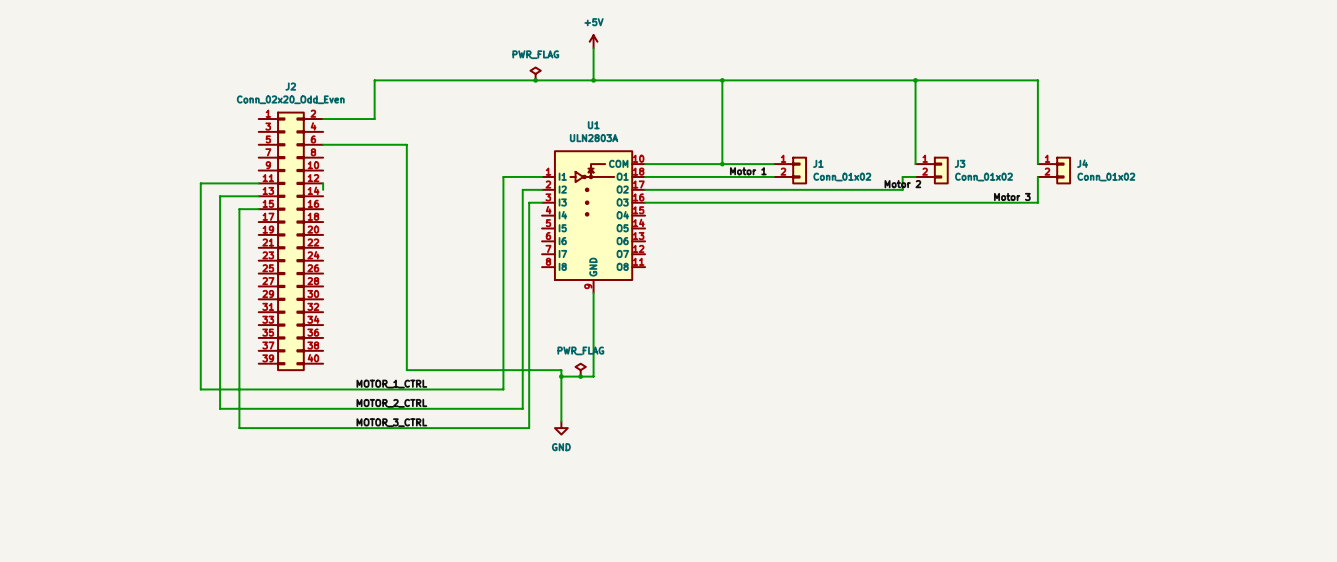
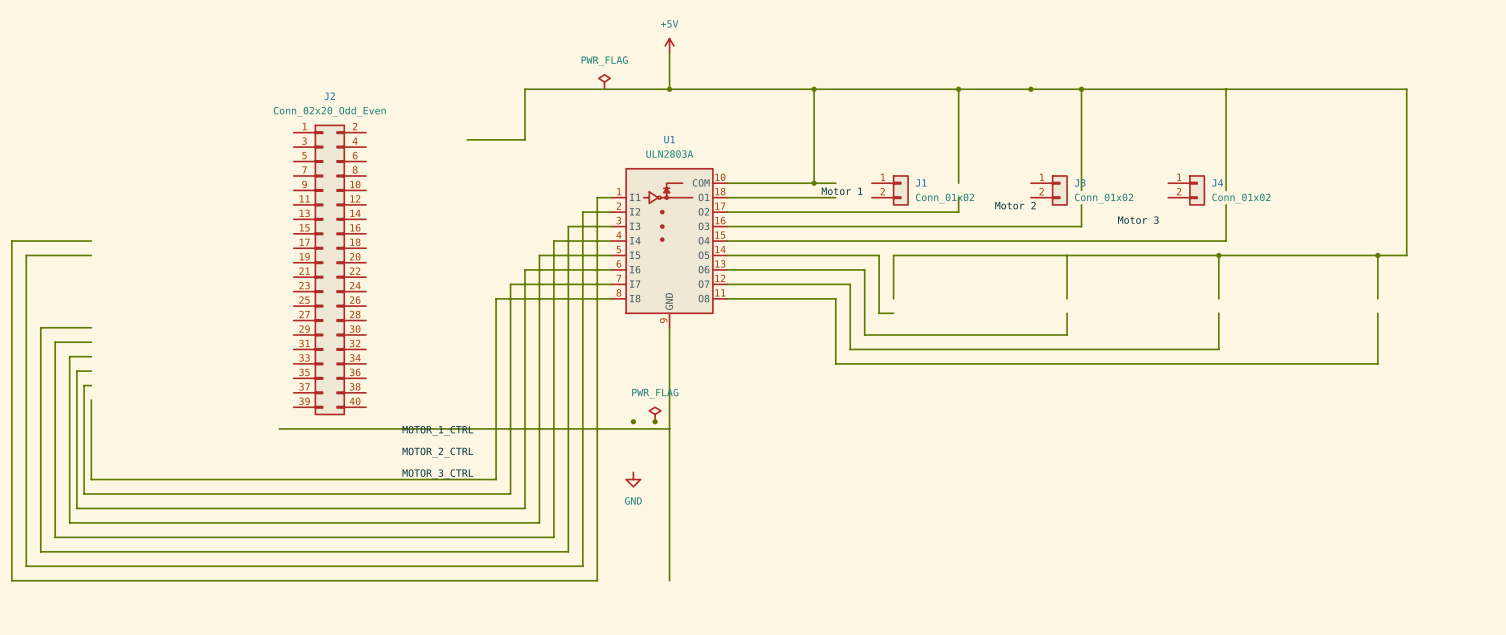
wire: (464, 80) (374, 80) (374, 119) (323, 119) -> (524, 89) (524, 139) (467, 139)
junction: (535, 80) -> none
junction: none -> (958, 89)
wire: (915, 80) (915, 164) -> (958, 89) (958, 183)
wire: none -> (1081, 89) (1081, 190)
junction: none -> (1081, 89)
wire: (1037, 80) (1037, 164) -> (1168, 89) (1406, 89) (1406, 255) (893, 255) (893, 298)
wire: none -> (1226, 89) (1226, 190)
wire: (323, 144) (406, 144) (406, 370) (561, 370) (561, 421) -> none
wire: (741, 164) (773, 164) -> none
wire: (529, 176) (503, 176) (503, 202) -> (597, 197) (597, 226) (568, 226)
wire: (741, 176) (773, 176) -> none
wire: (915, 176) (902, 176) (902, 189) (851, 189) -> (958, 197) (958, 212)
wire: (1037, 176) (1037, 202) (960, 202) -> (1081, 204) (1081, 226)
wire: (258, 183) (200, 183) (200, 389) (503, 389) -> (91, 327) (40, 327) (40, 551) (568, 551) (568, 436)
wire: (323, 183) (323, 189) -> none
wire: none -> (1226, 204) (1226, 241) (727, 241)
wire: (522, 189) (522, 408) (220, 408) (220, 196) (258, 196) -> (590, 212) (582, 212) (582, 566) (26, 566) (26, 255) (91, 255)
wire: (258, 209) (239, 209) (239, 428) -> (91, 400) (91, 479) (272, 479)
wire: none -> (91, 241) (11, 241) (11, 580) (597, 580) (597, 479)
wire: none -> (611, 241) (553, 241) (553, 537) (55, 537) (55, 342) (91, 342)
wire: none -> (611, 255) (539, 255) (539, 522) (69, 522) (69, 356) (91, 356)
wire: none -> (727, 255) (879, 255) (879, 313) (893, 313)
wire: none -> (1067, 255) (1067, 298)
wire: none -> (1218, 255) (1218, 298)
junction: none -> (1218, 255)
wire: none -> (1377, 255) (1377, 298)
junction: none -> (1377, 255)
wire: none -> (611, 269) (524, 269) (524, 508) (76, 508) (76, 371) (91, 371)
wire: none -> (727, 269) (864, 269) (864, 334) (1067, 334) (1067, 313)
wire: none -> (611, 284) (510, 284) (510, 493) (84, 493) (84, 385) (91, 385)
wire: none -> (727, 284) (850, 284) (850, 349) (1218, 349) (1218, 313)
wire: none -> (727, 298) (835, 298) (835, 363) (1377, 363) (1377, 313)
wire: (561, 376) (593, 376) -> (669, 580) (669, 421)
wire: none -> (279, 428) (669, 428)
wire: (439, 428) (529, 428) -> (496, 479) (496, 298) (611, 298)

